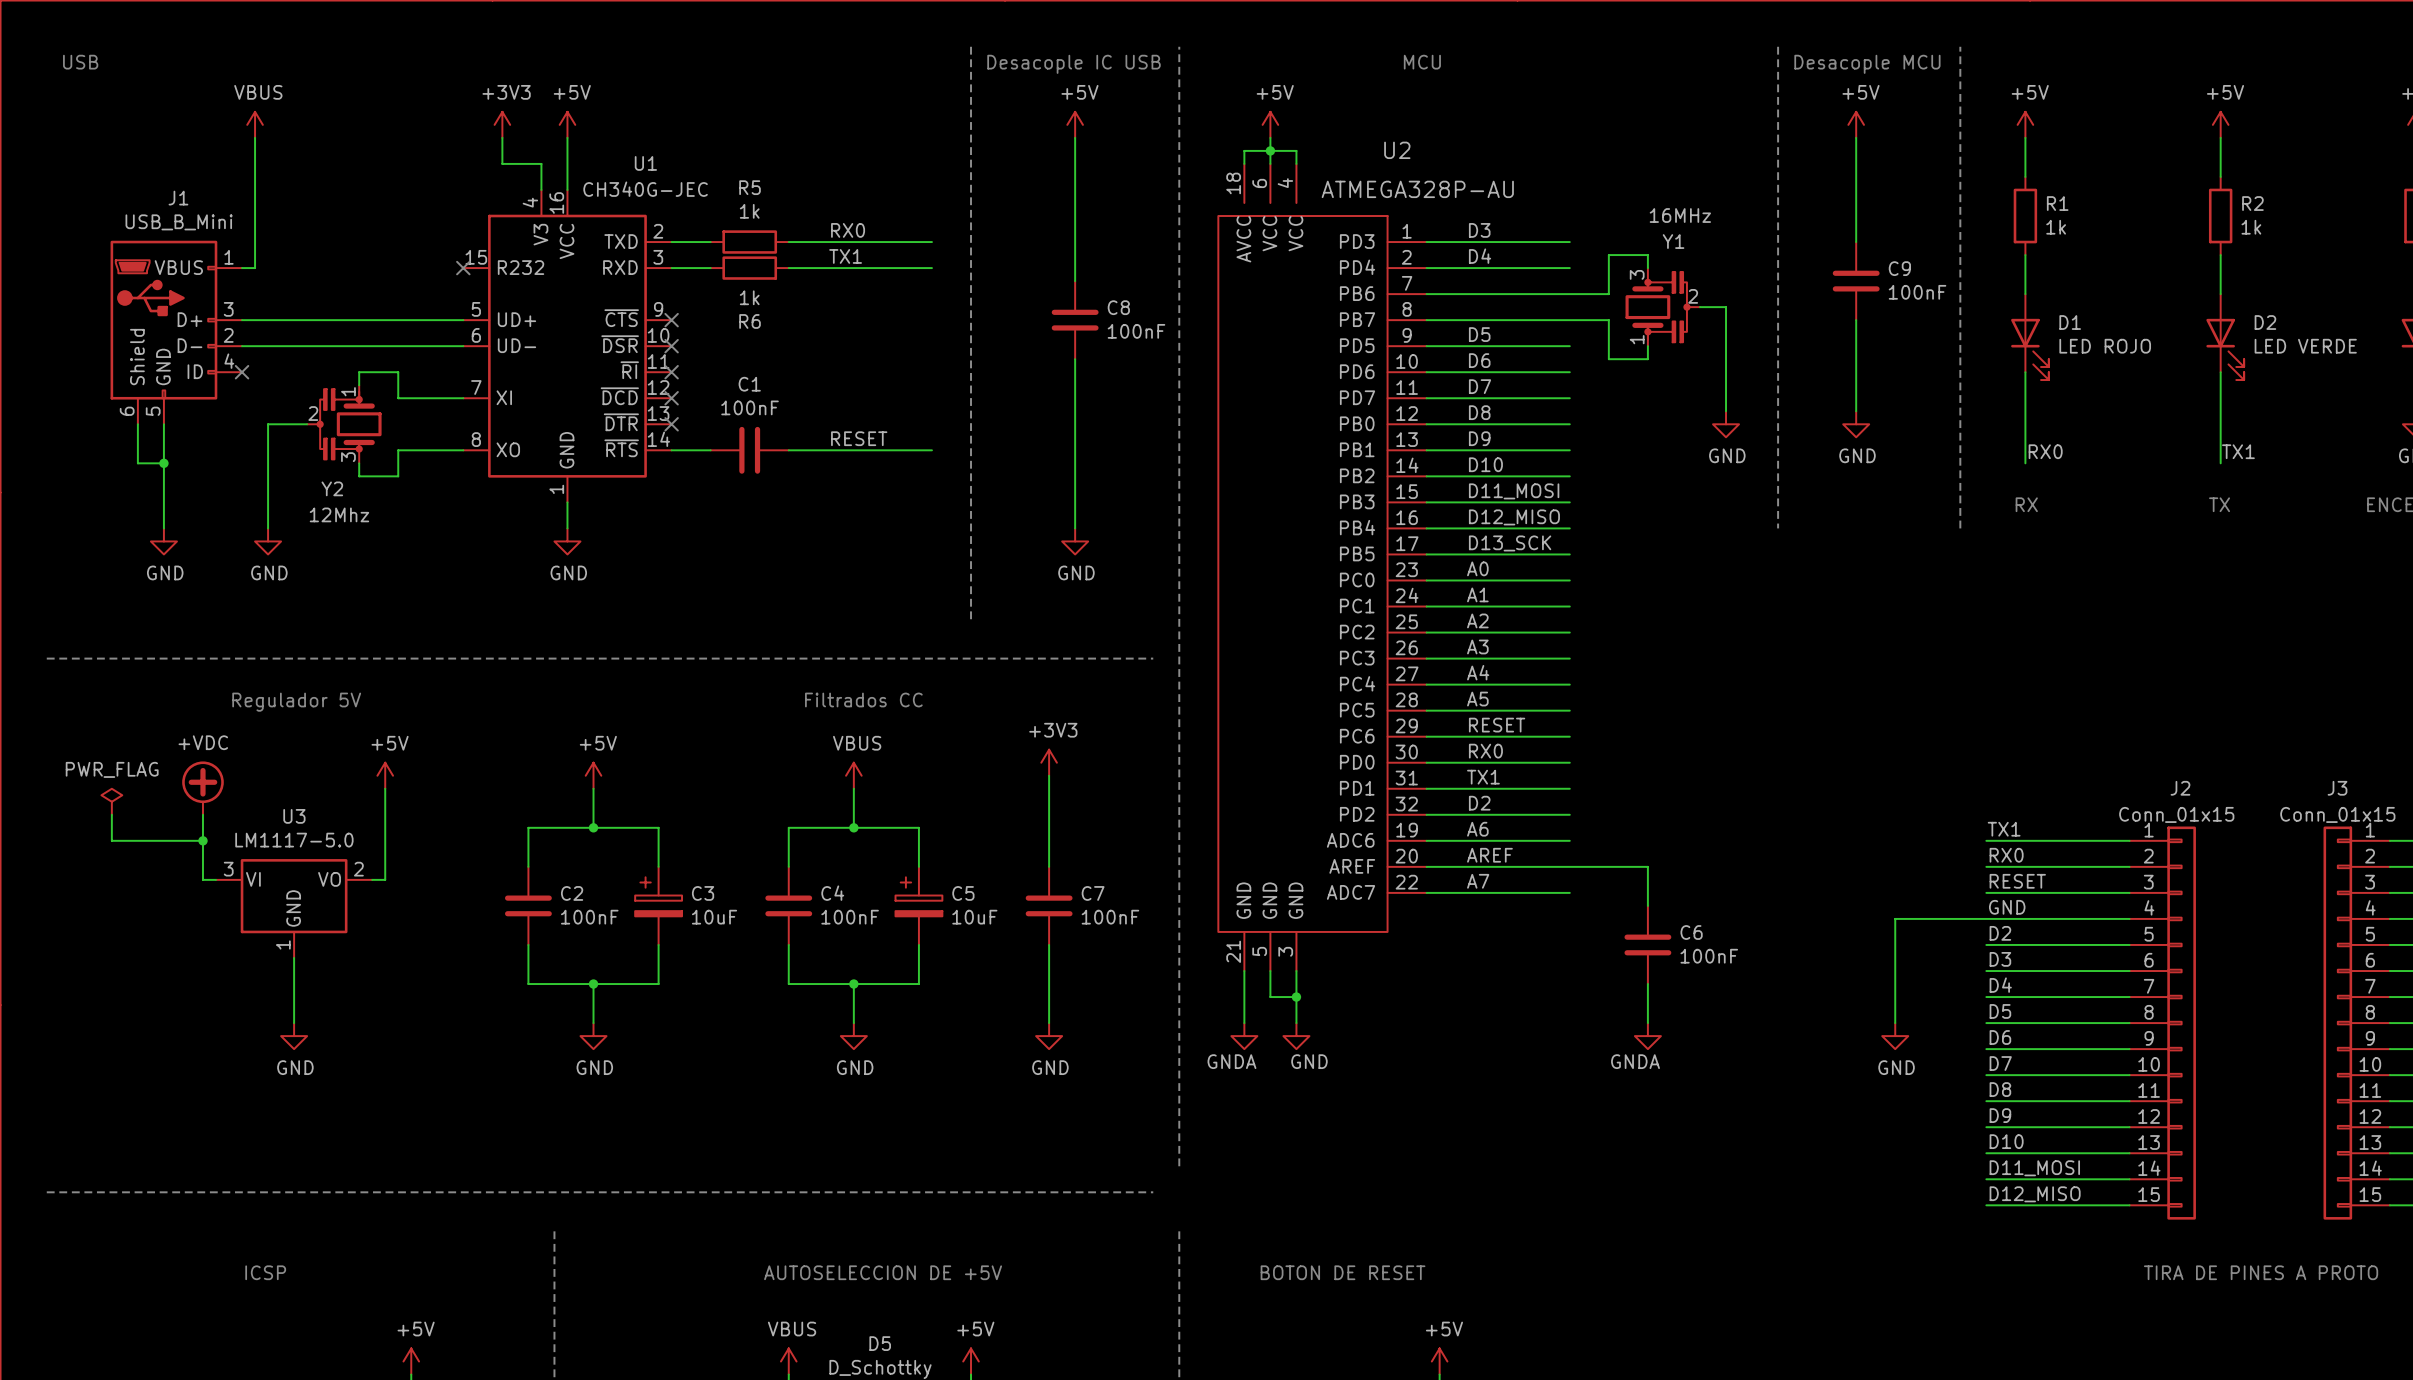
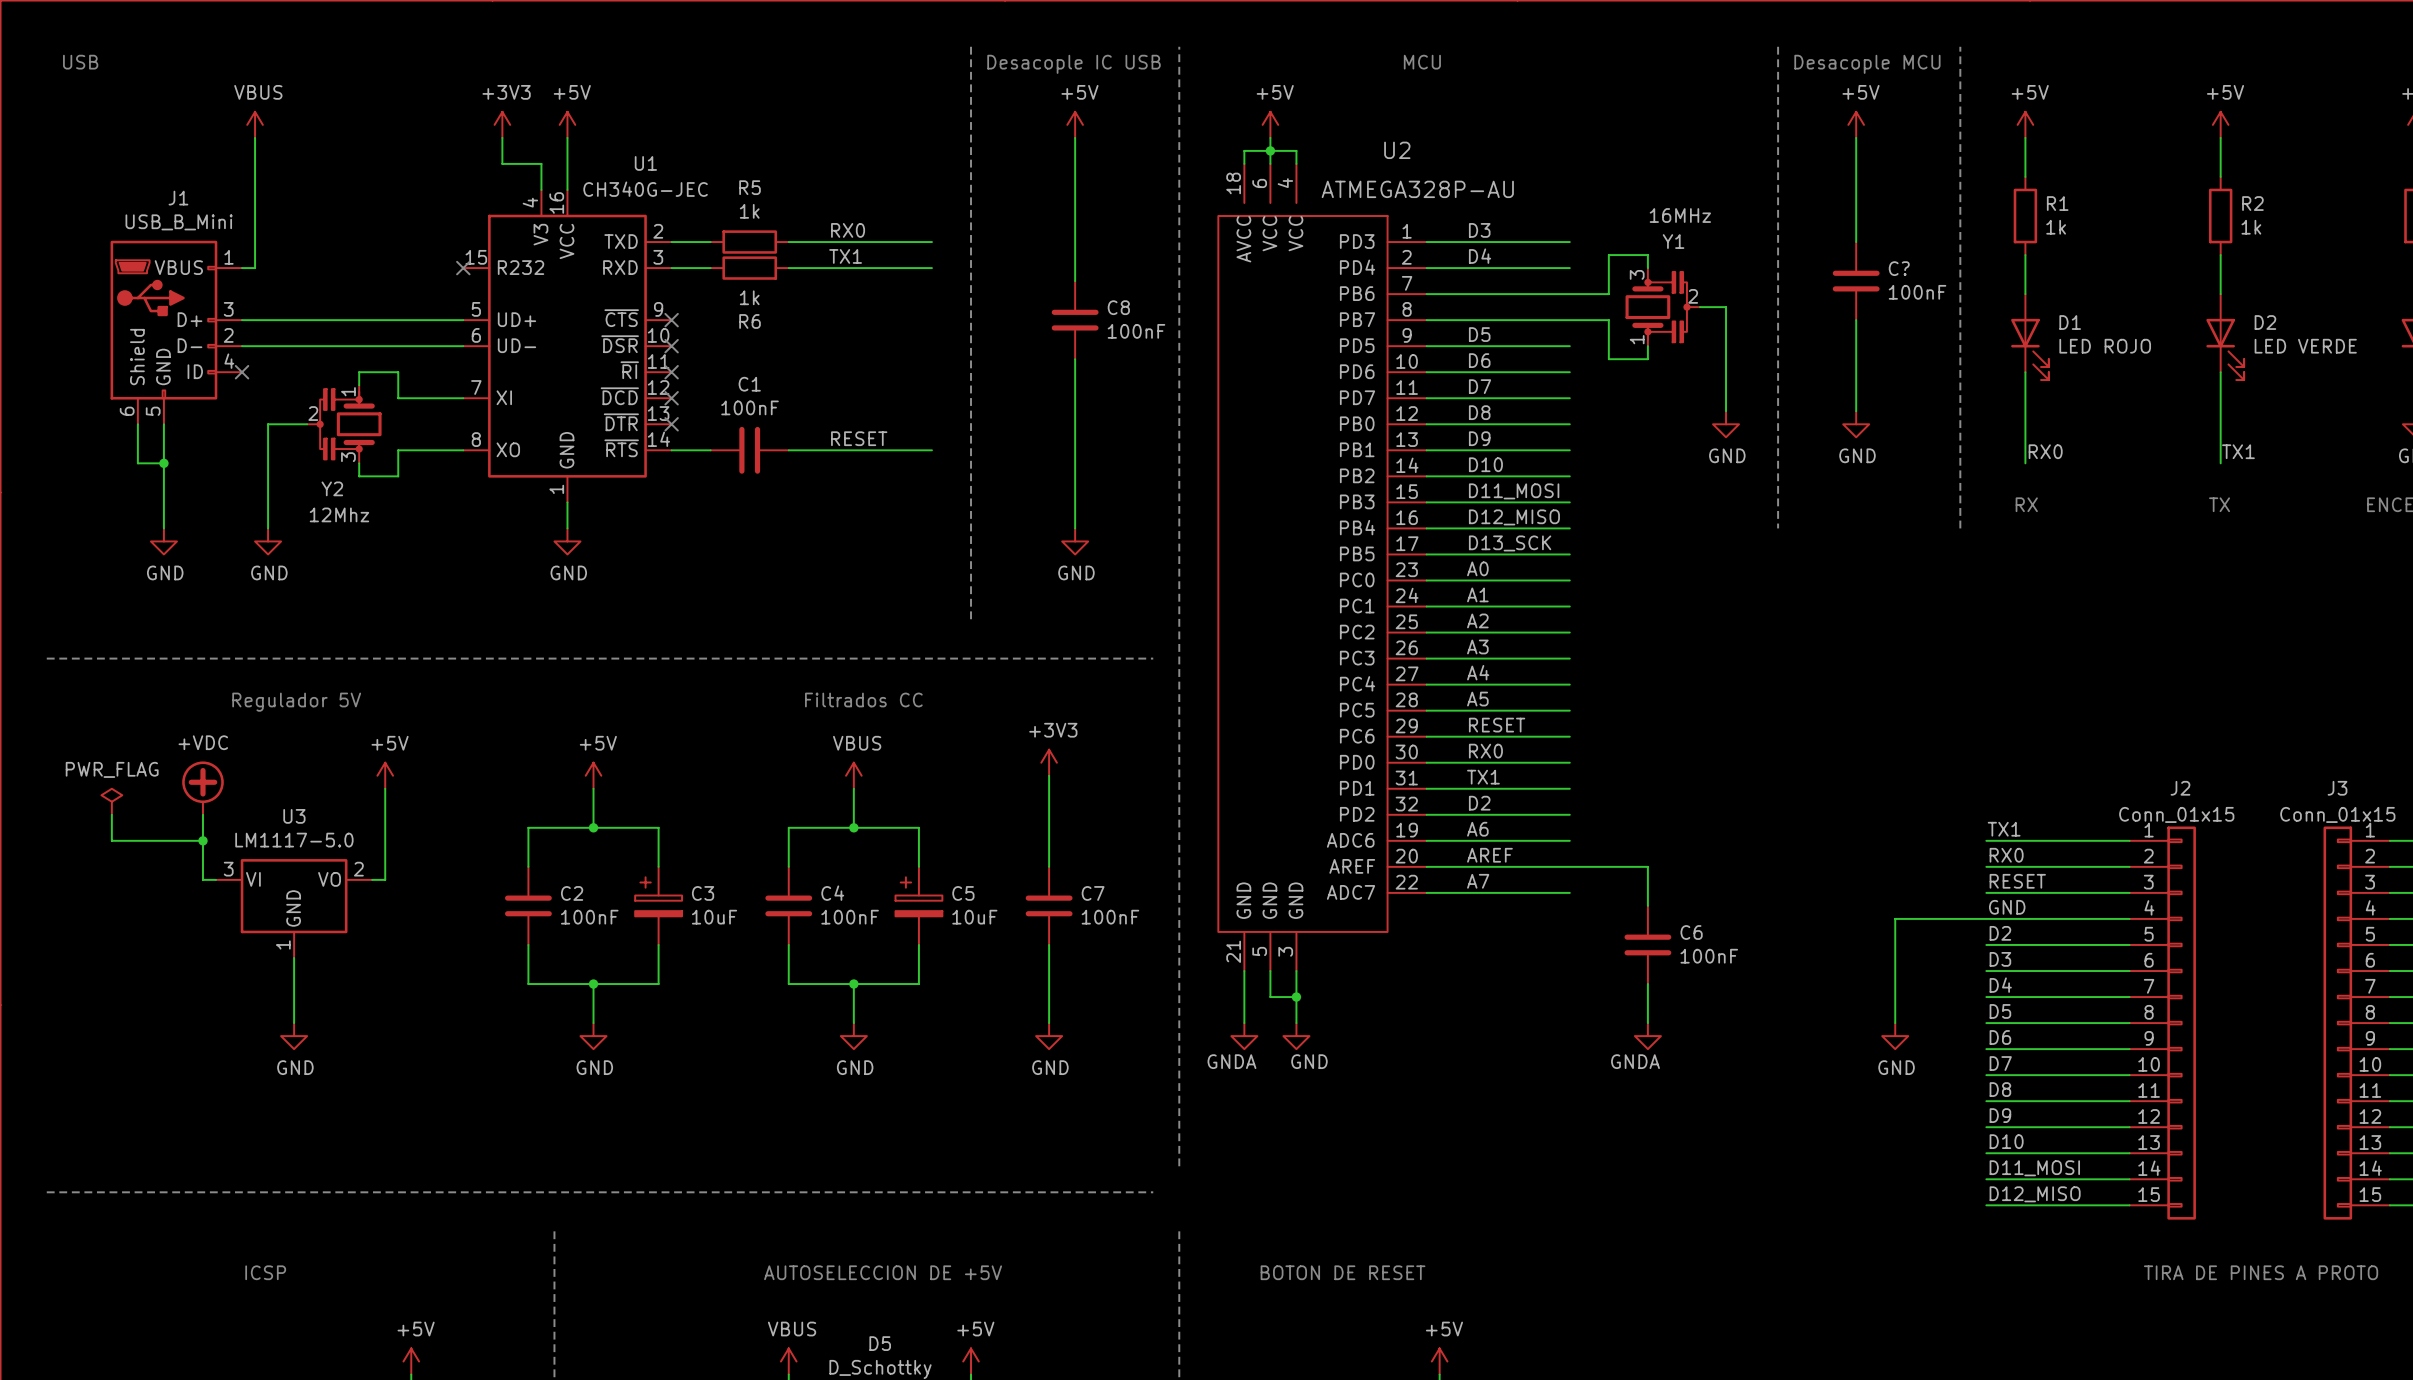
C9 name: C9 (1899, 268) -> C? (1899, 268)

